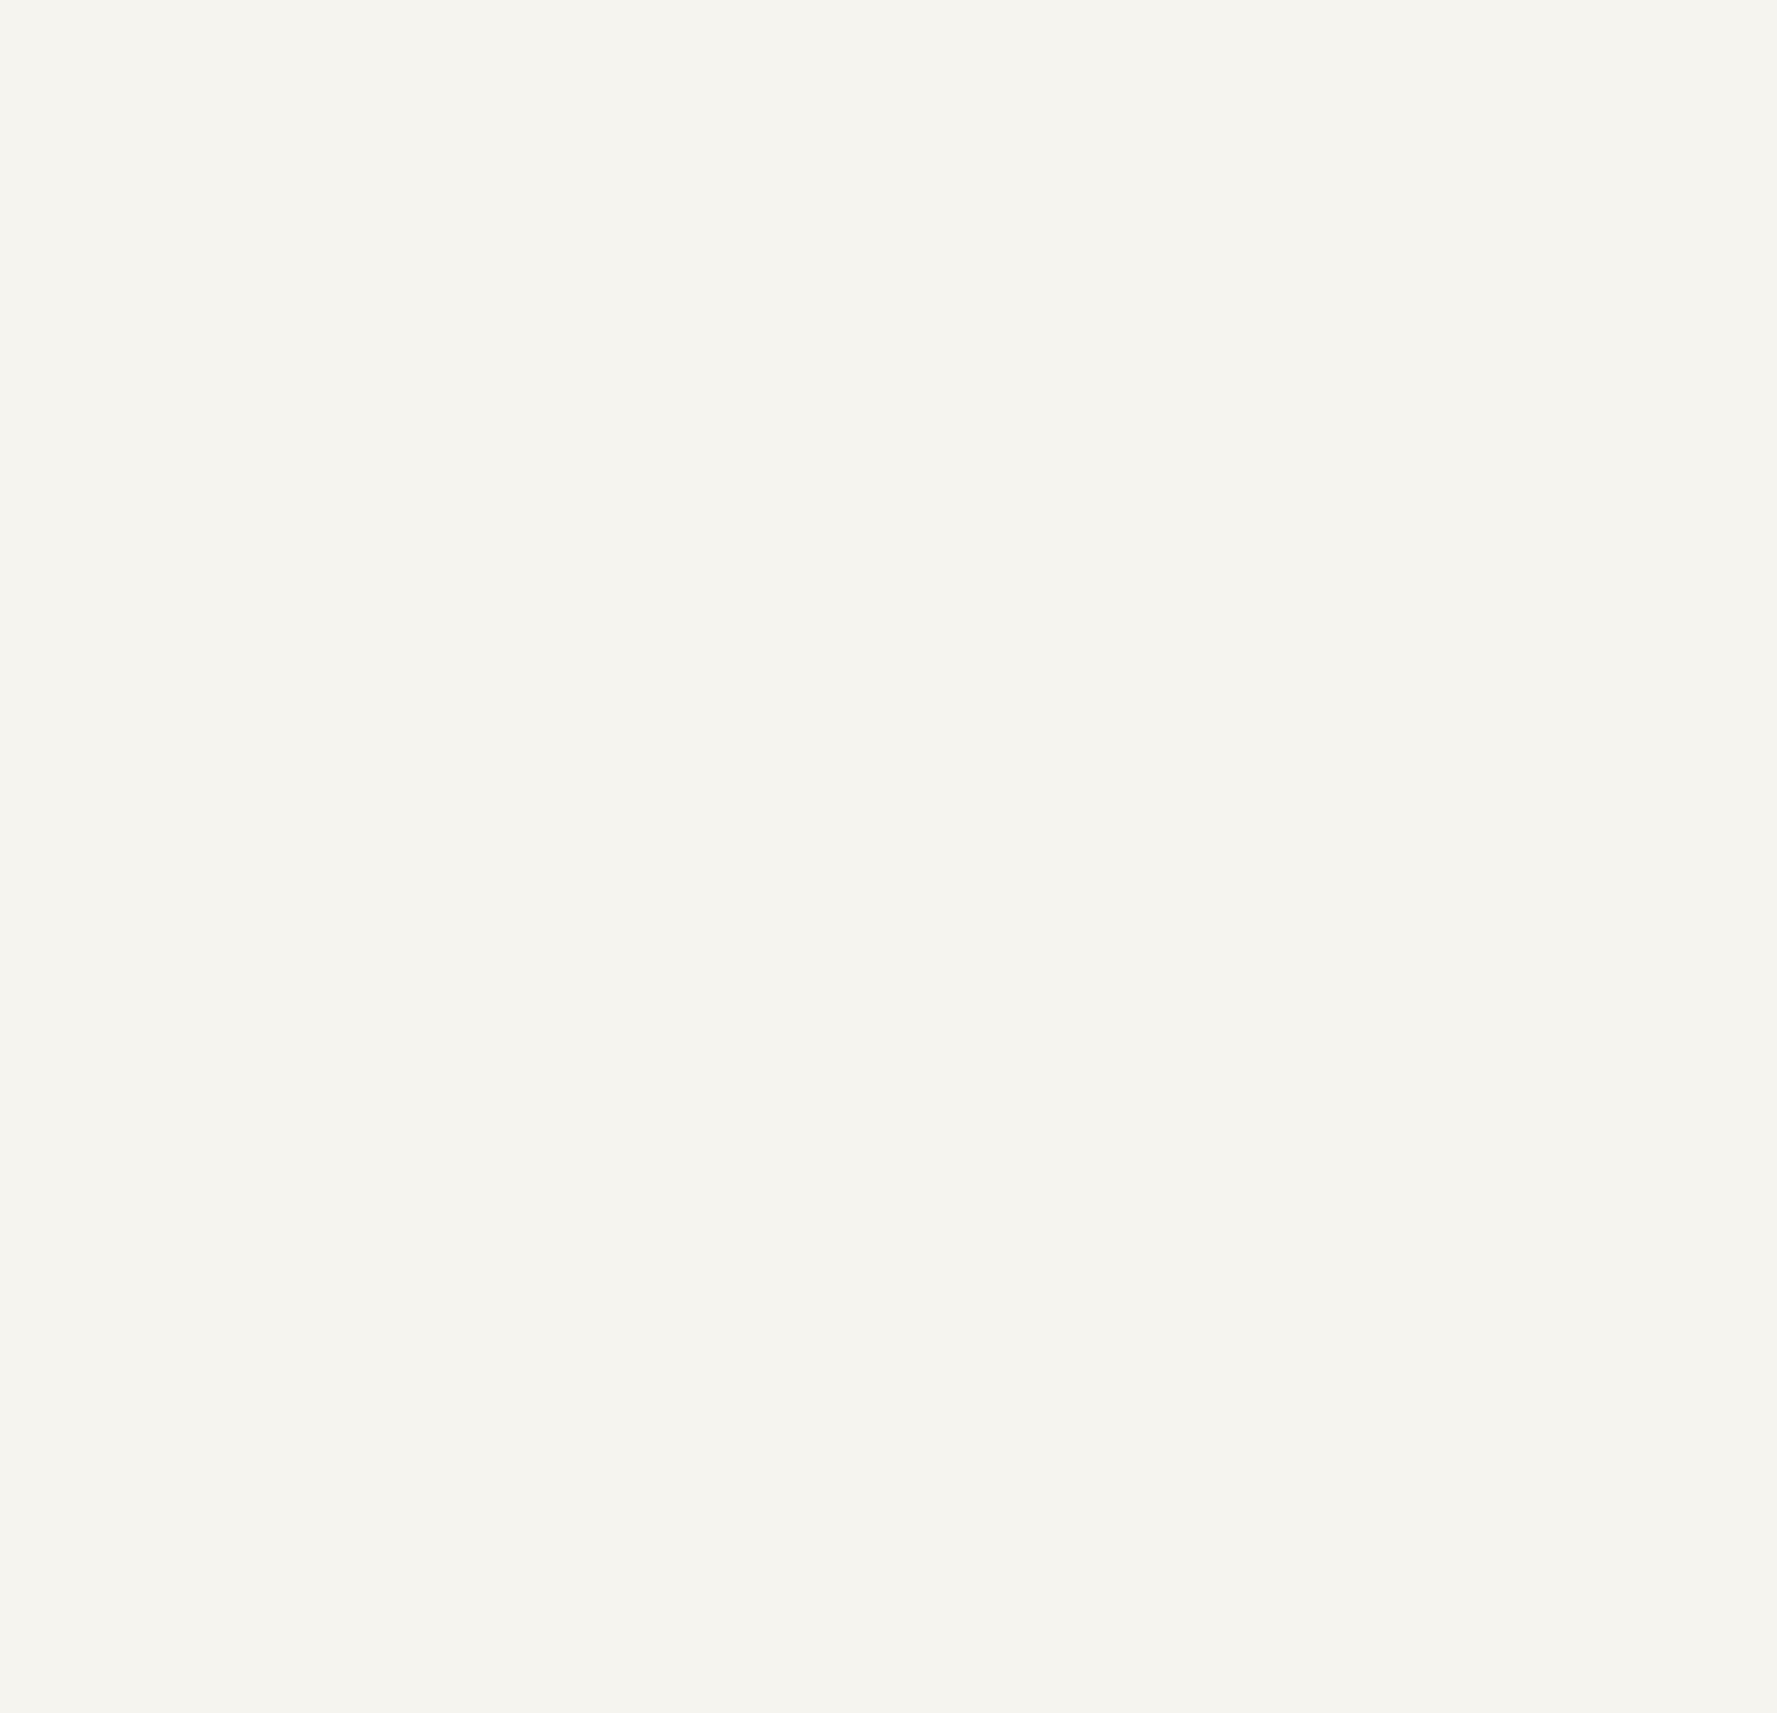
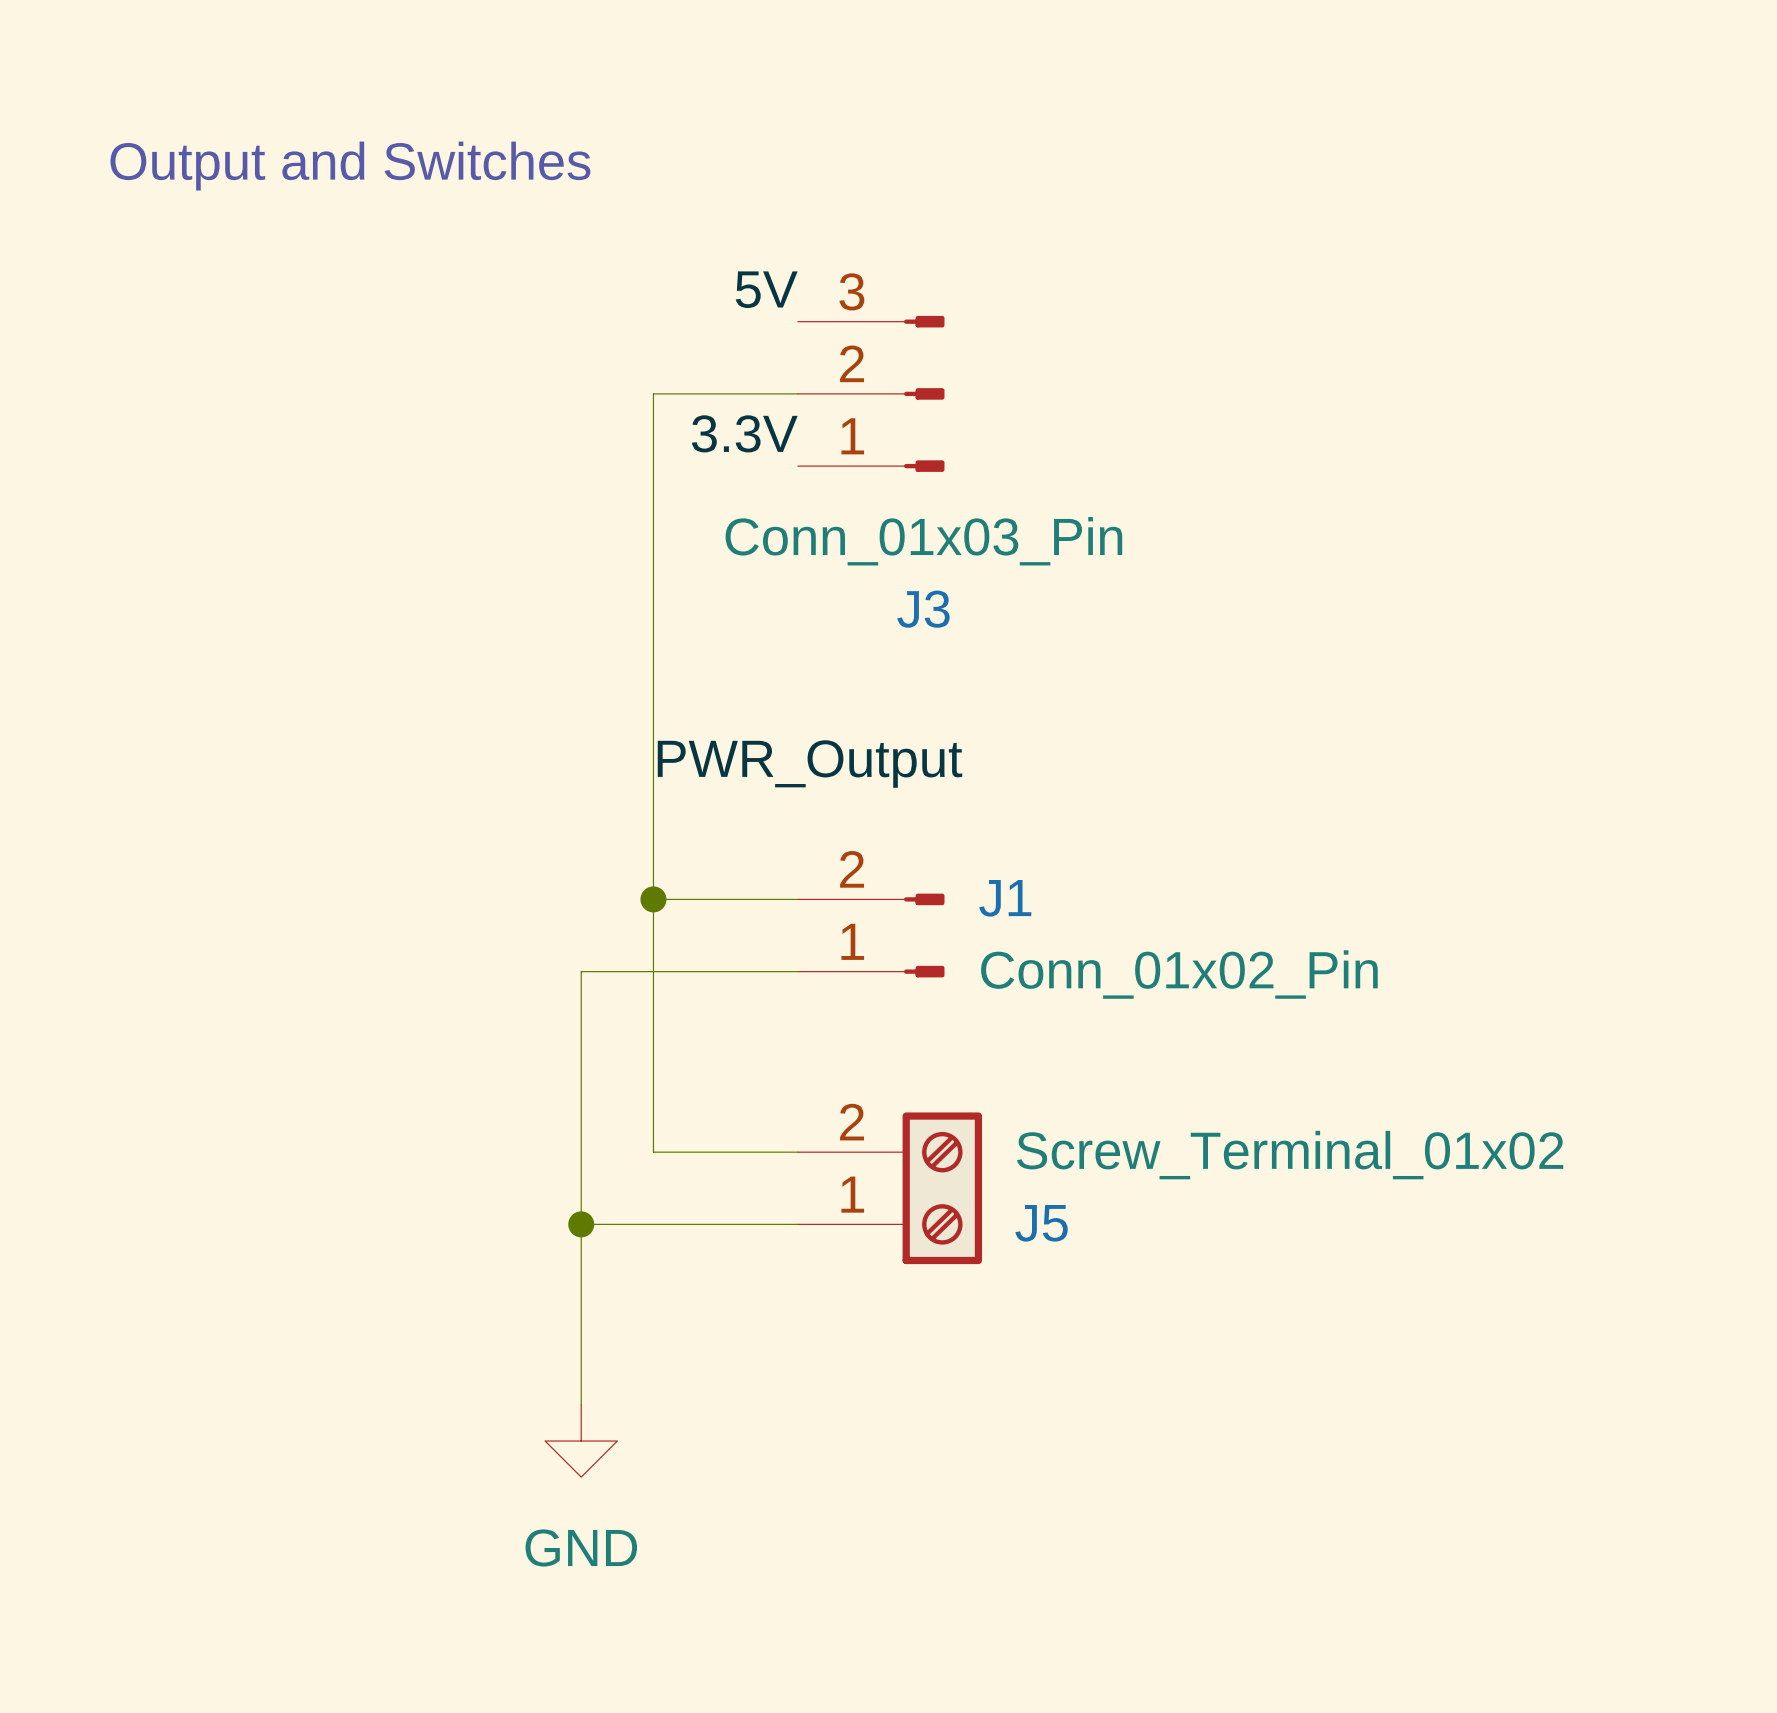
text: none -> Output and Switches (350, 166)
label: none -> 5V (766, 289)
wire: none -> (797, 393) (653, 393) (653, 1152) (797, 1152)
J3: none -> Conn_01x03_Pin (871, 393)
label: none -> 3.3V (744, 433)
label: none -> PWR_Output (810, 764)
wire: none -> (653, 899) (797, 899)
junction: none -> (653, 899)
J1: none -> Conn_01x02_Pin (871, 935)
wire: none -> (797, 971) (581, 971) (581, 1404)
J5: none -> Screw_Terminal_01x02 (889, 1188)
wire: none -> (581, 1224) (797, 1224)
junction: none -> (581, 1224)
power symbol: none -> GND (581, 1441)

